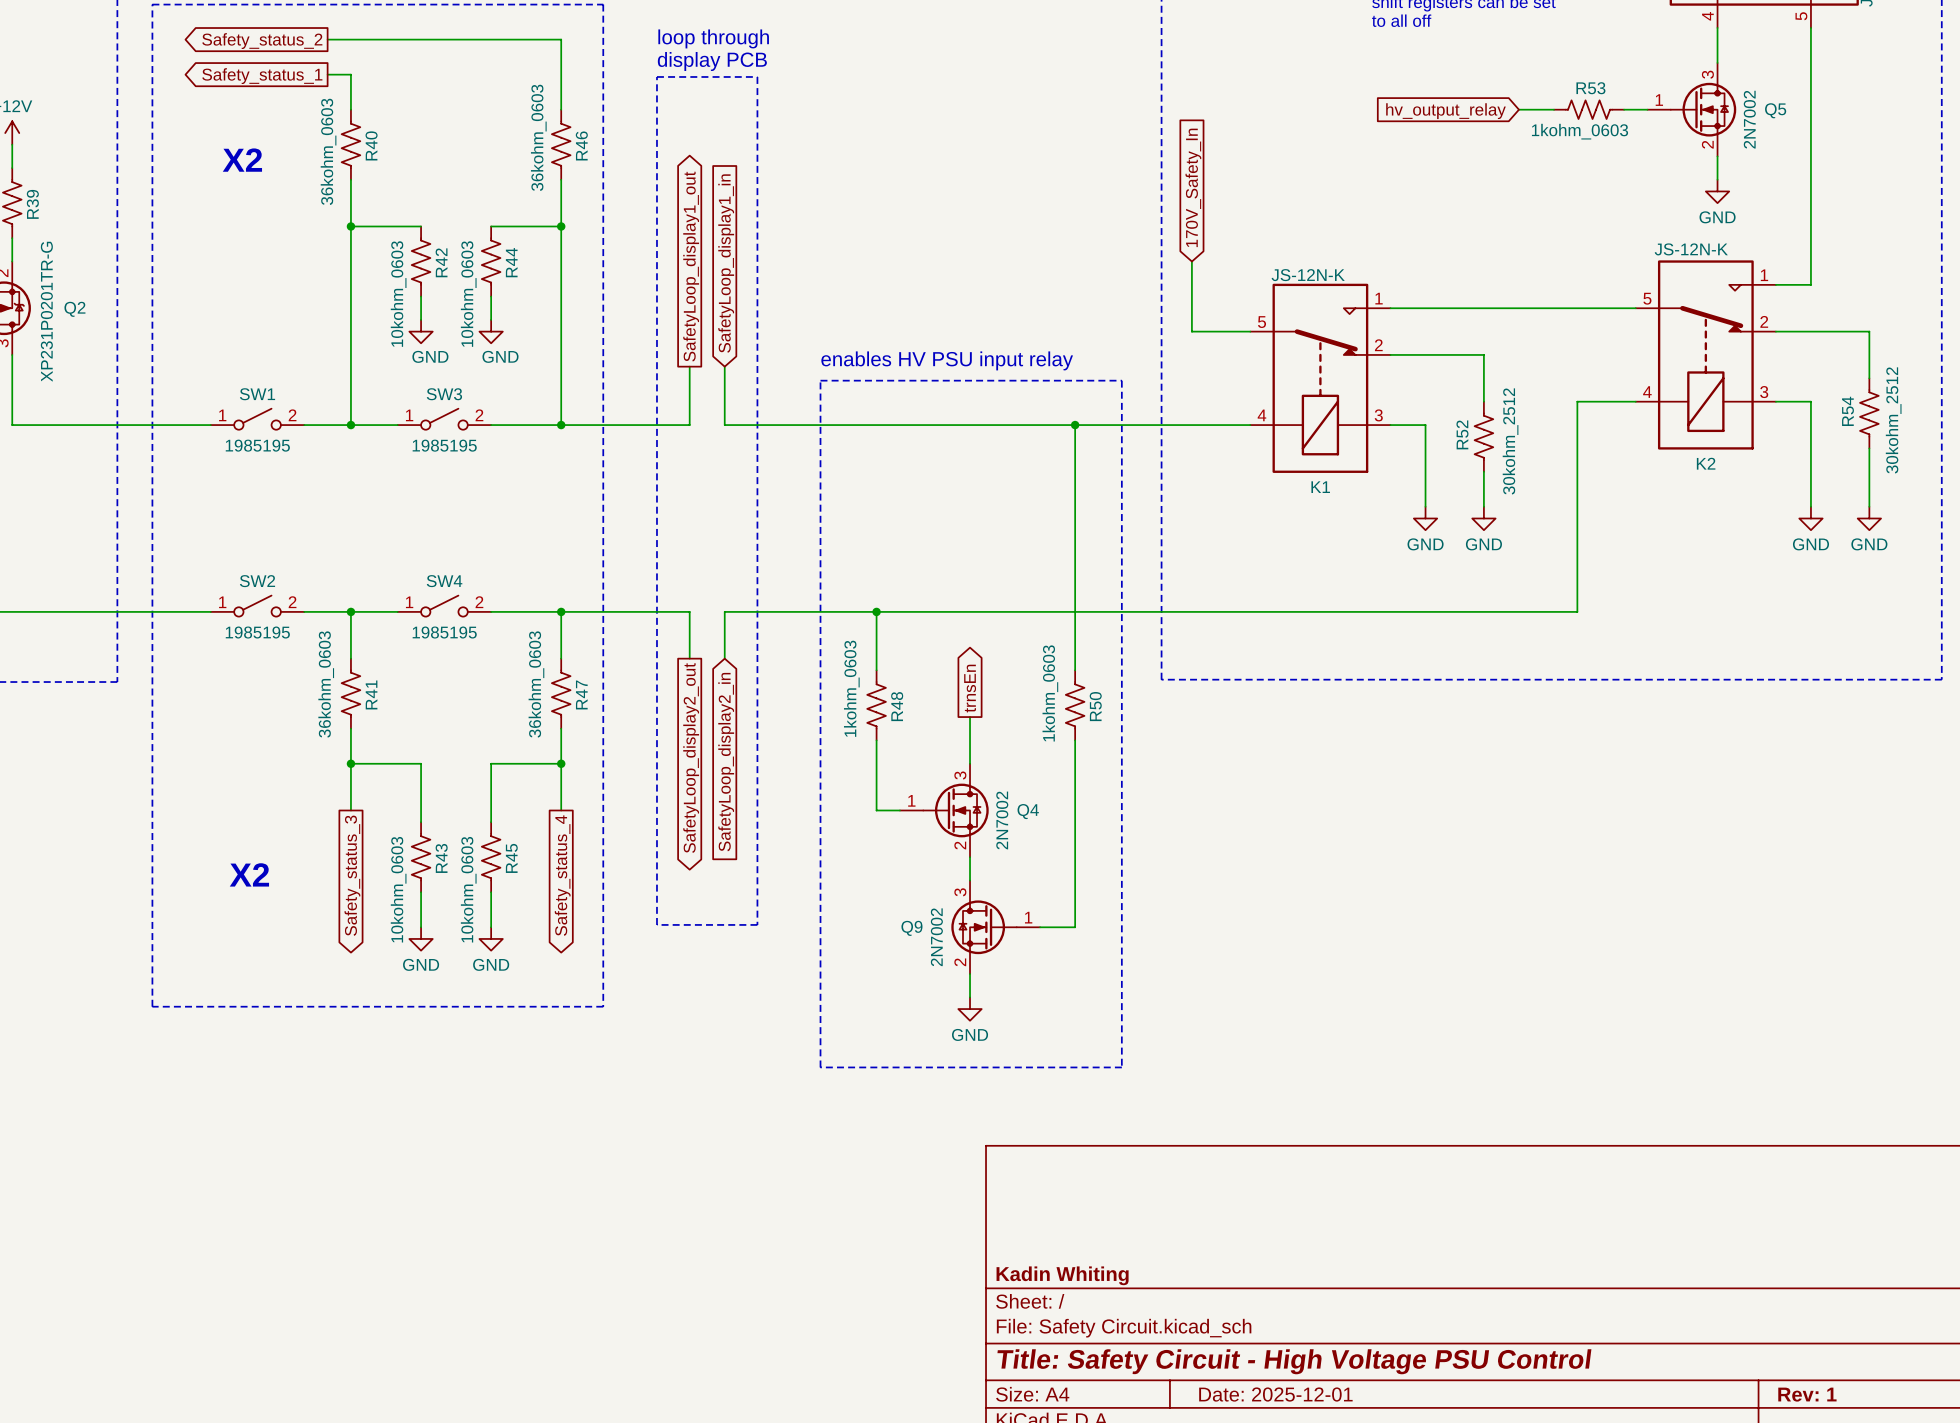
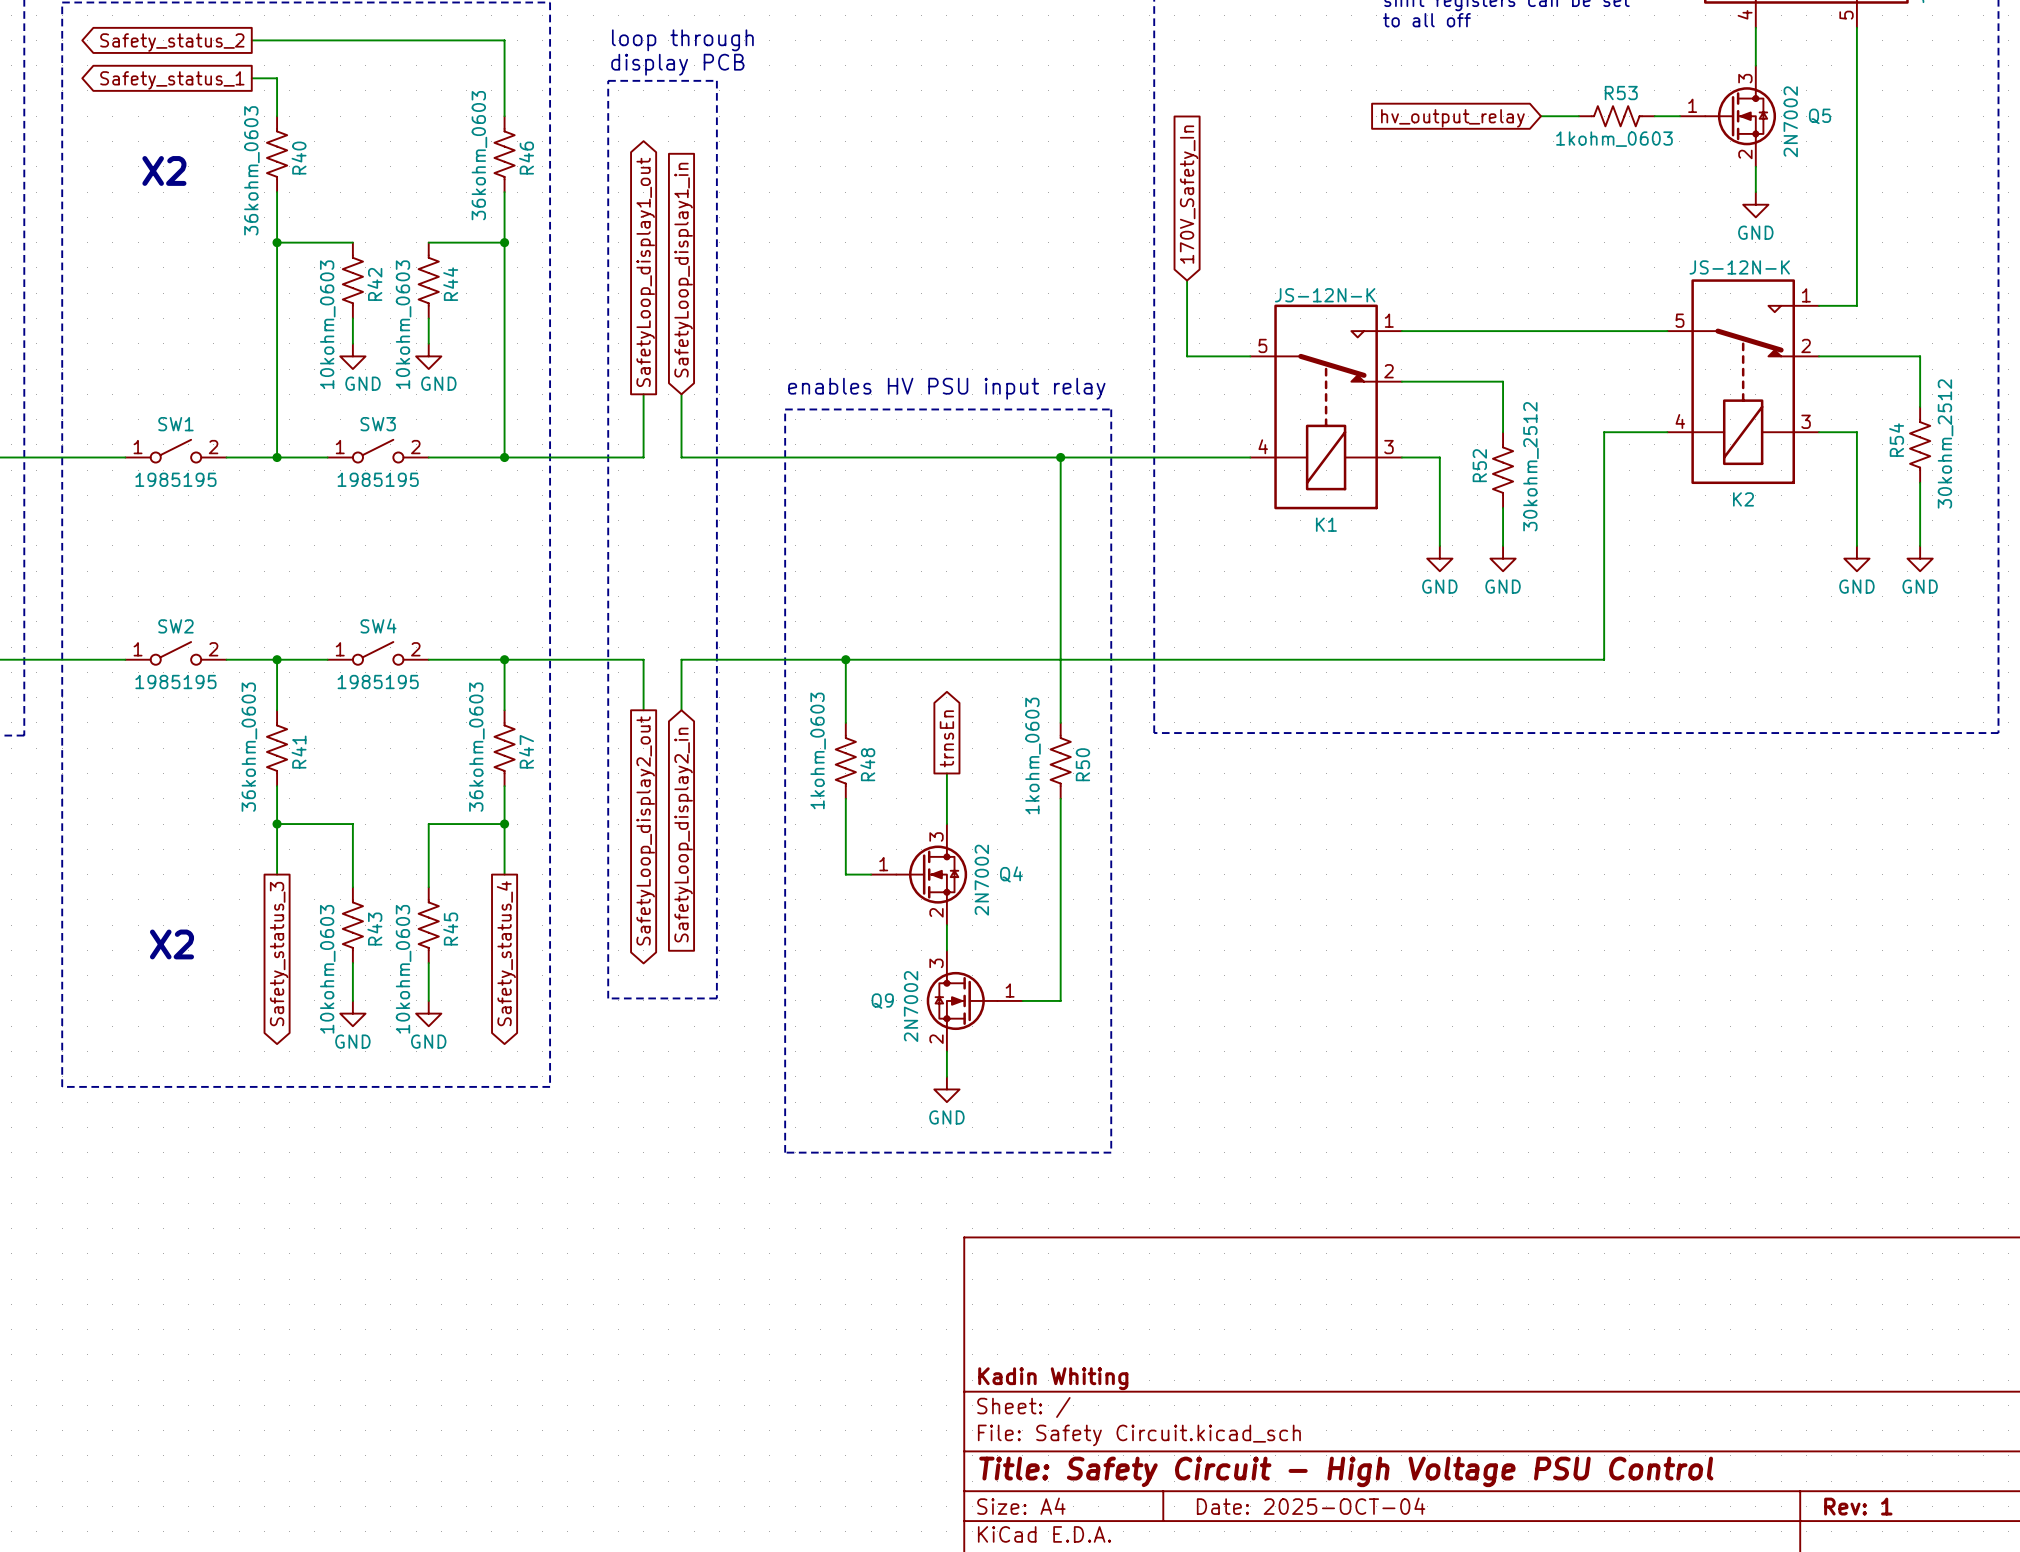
title block: Date: 2025-12-01 (1275, 1394) -> Date: 2025-OCT-04 (1311, 1506)

